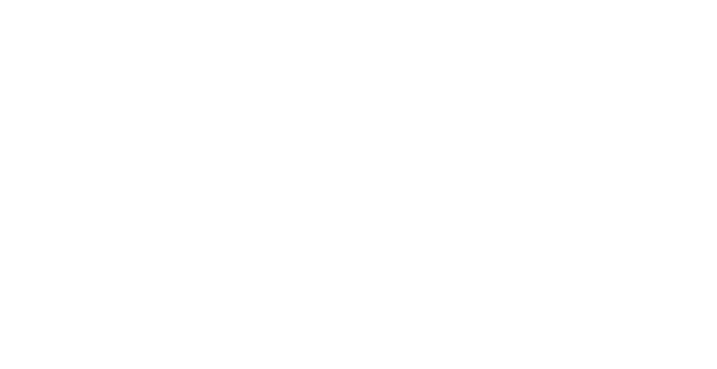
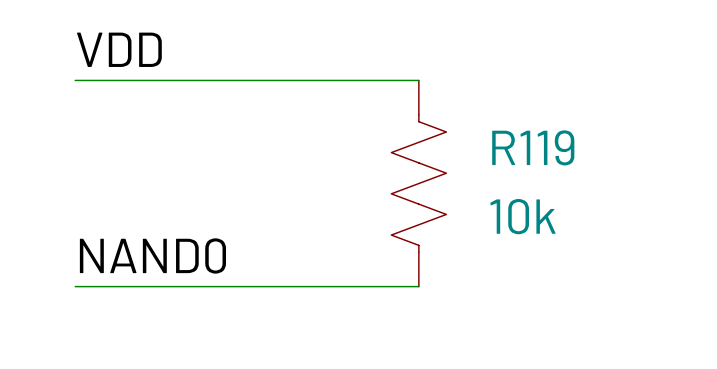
label: none -> VDD (119, 49)
wire: none -> (75, 80) (418, 80)
R119: none -> 10k (418, 183)
label: none -> NAND0 (152, 255)
wire: none -> (75, 286) (418, 286)

